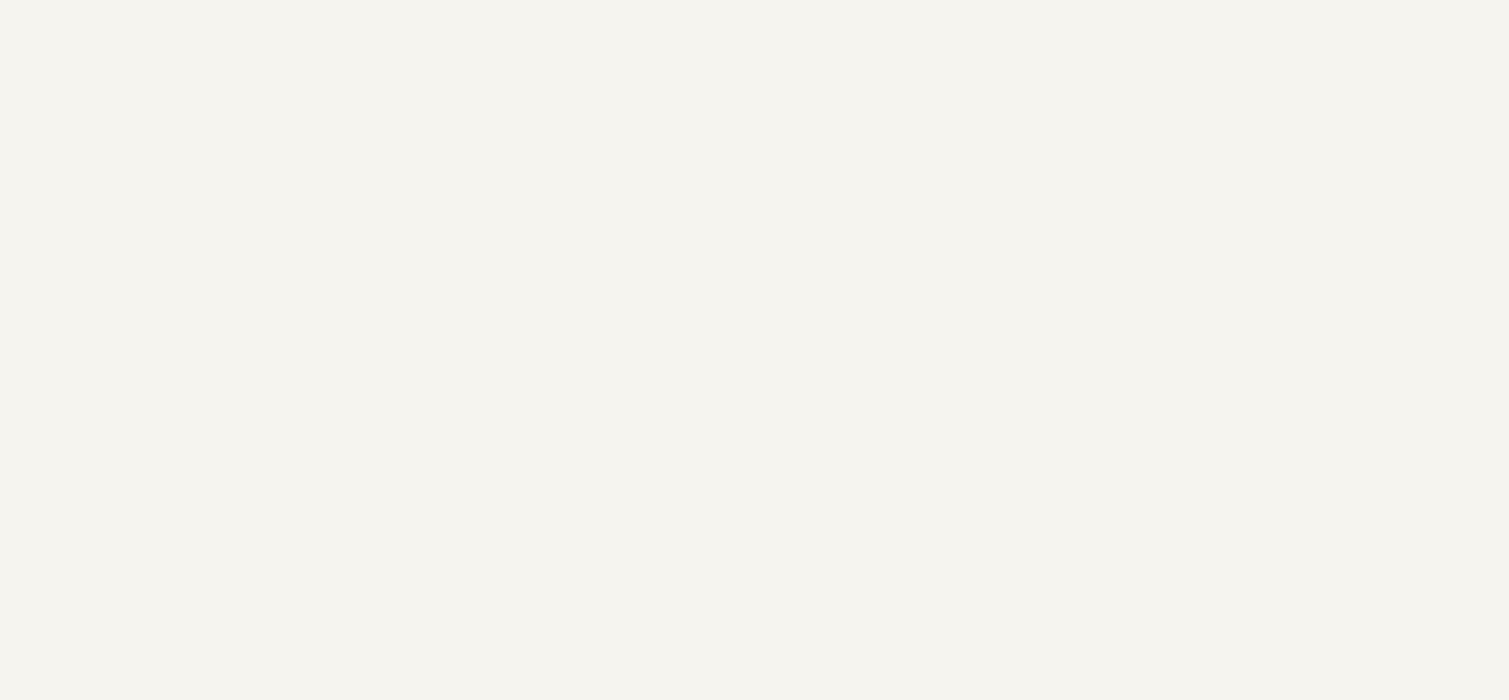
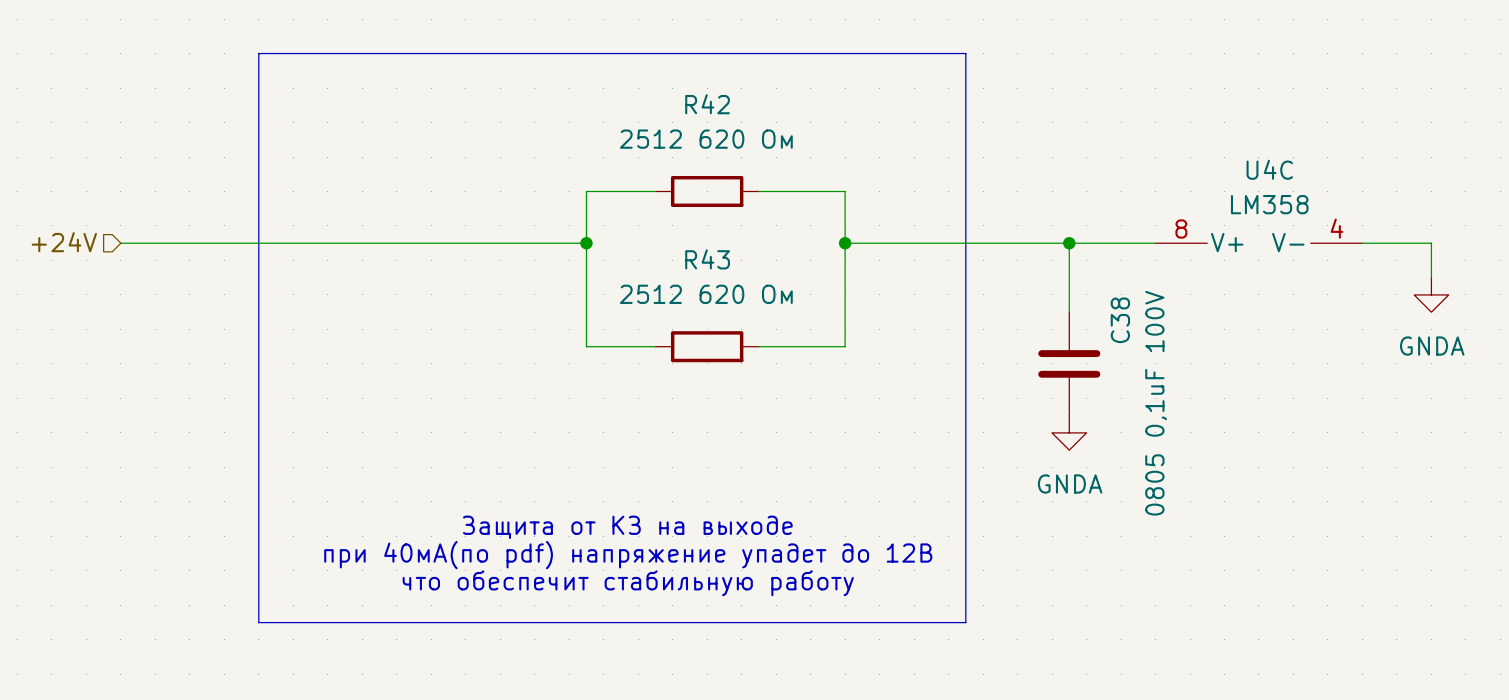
line: none -> (258, 53) (965, 53) (965, 622) (258, 622) (258, 53)
wire: none -> (655, 191) (586, 191) (586, 346) (655, 346)
R42: none -> 2512 620 Ом (707, 191)
wire: none -> (758, 191) (845, 191) (845, 346) (758, 346)
hierarchical label: none -> +24V (64, 242)
wire: none -> (120, 243) (586, 243)
junction: none -> (586, 243)
wire: none -> (845, 243) (1155, 243)
junction: none -> (845, 243)
wire: none -> (1069, 243) (1069, 312)
junction: none -> (1069, 243)
U4C: none -> LM358 (1258, 243)
wire: none -> (1362, 243) (1431, 243) (1431, 277)
power symbol: none -> GNDA (1431, 294)
R43: none -> 2512 620 Ом (707, 346)
C38: none -> 0805 0,1uF 100V (1069, 363)
power symbol: none -> GNDA (1069, 432)
text: none -> Защита от КЗ на выходе (627, 527)
text: none -> при 40мА(по pdf) напряжение упадет до 12В (628, 555)
text: none -> что обеспечит стабильную работу (628, 583)

